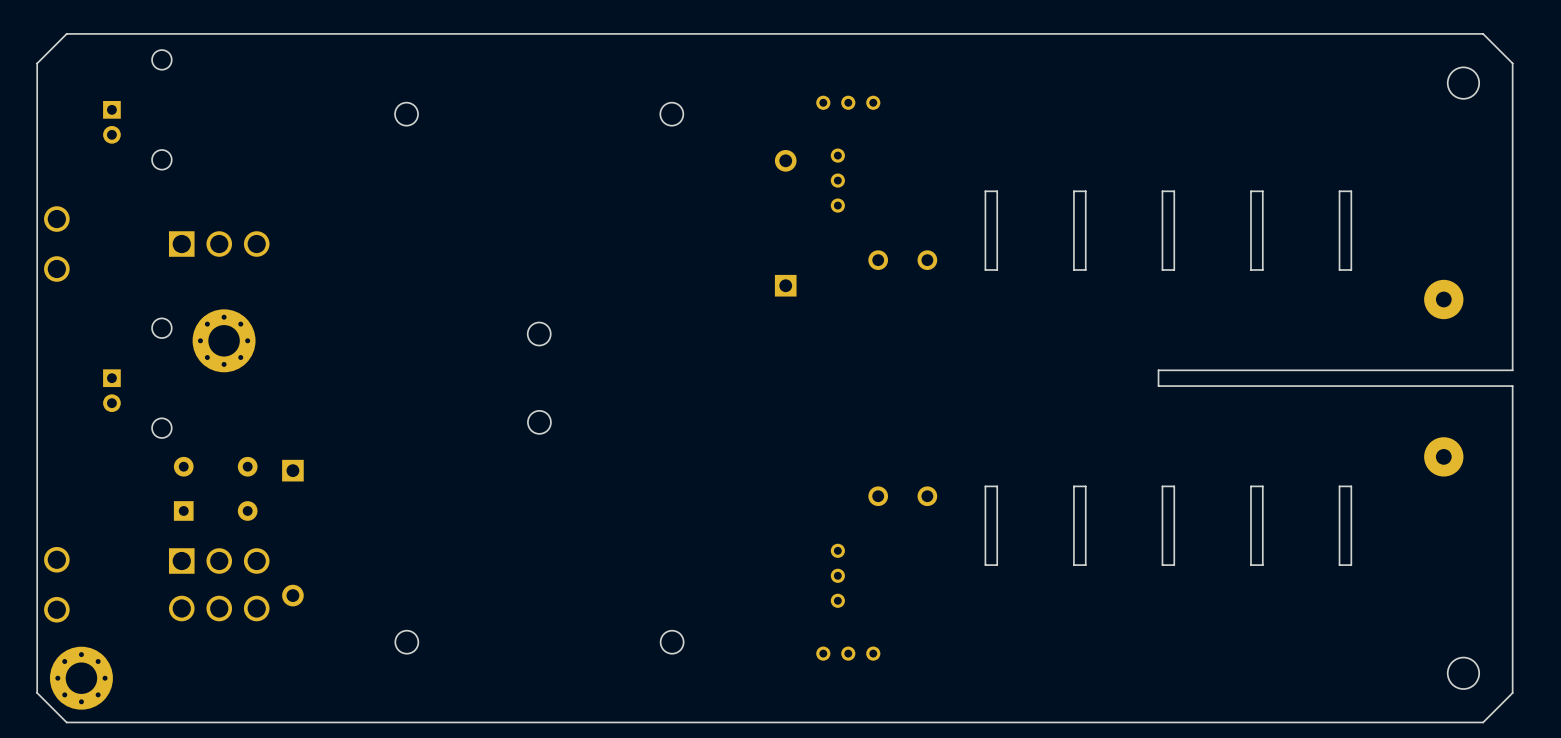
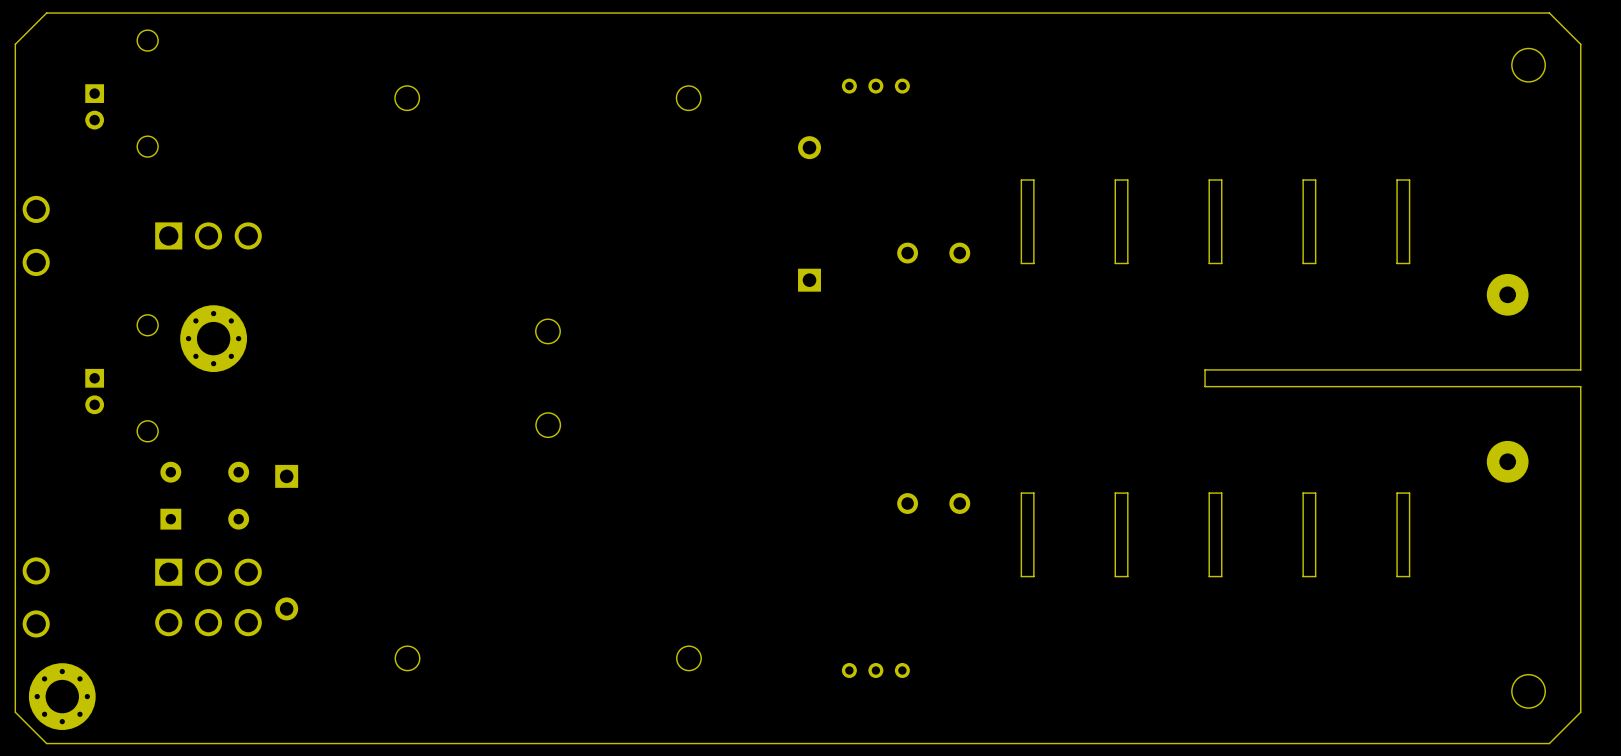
part: (837, 180) -> none
part: (837, 575) -> none

